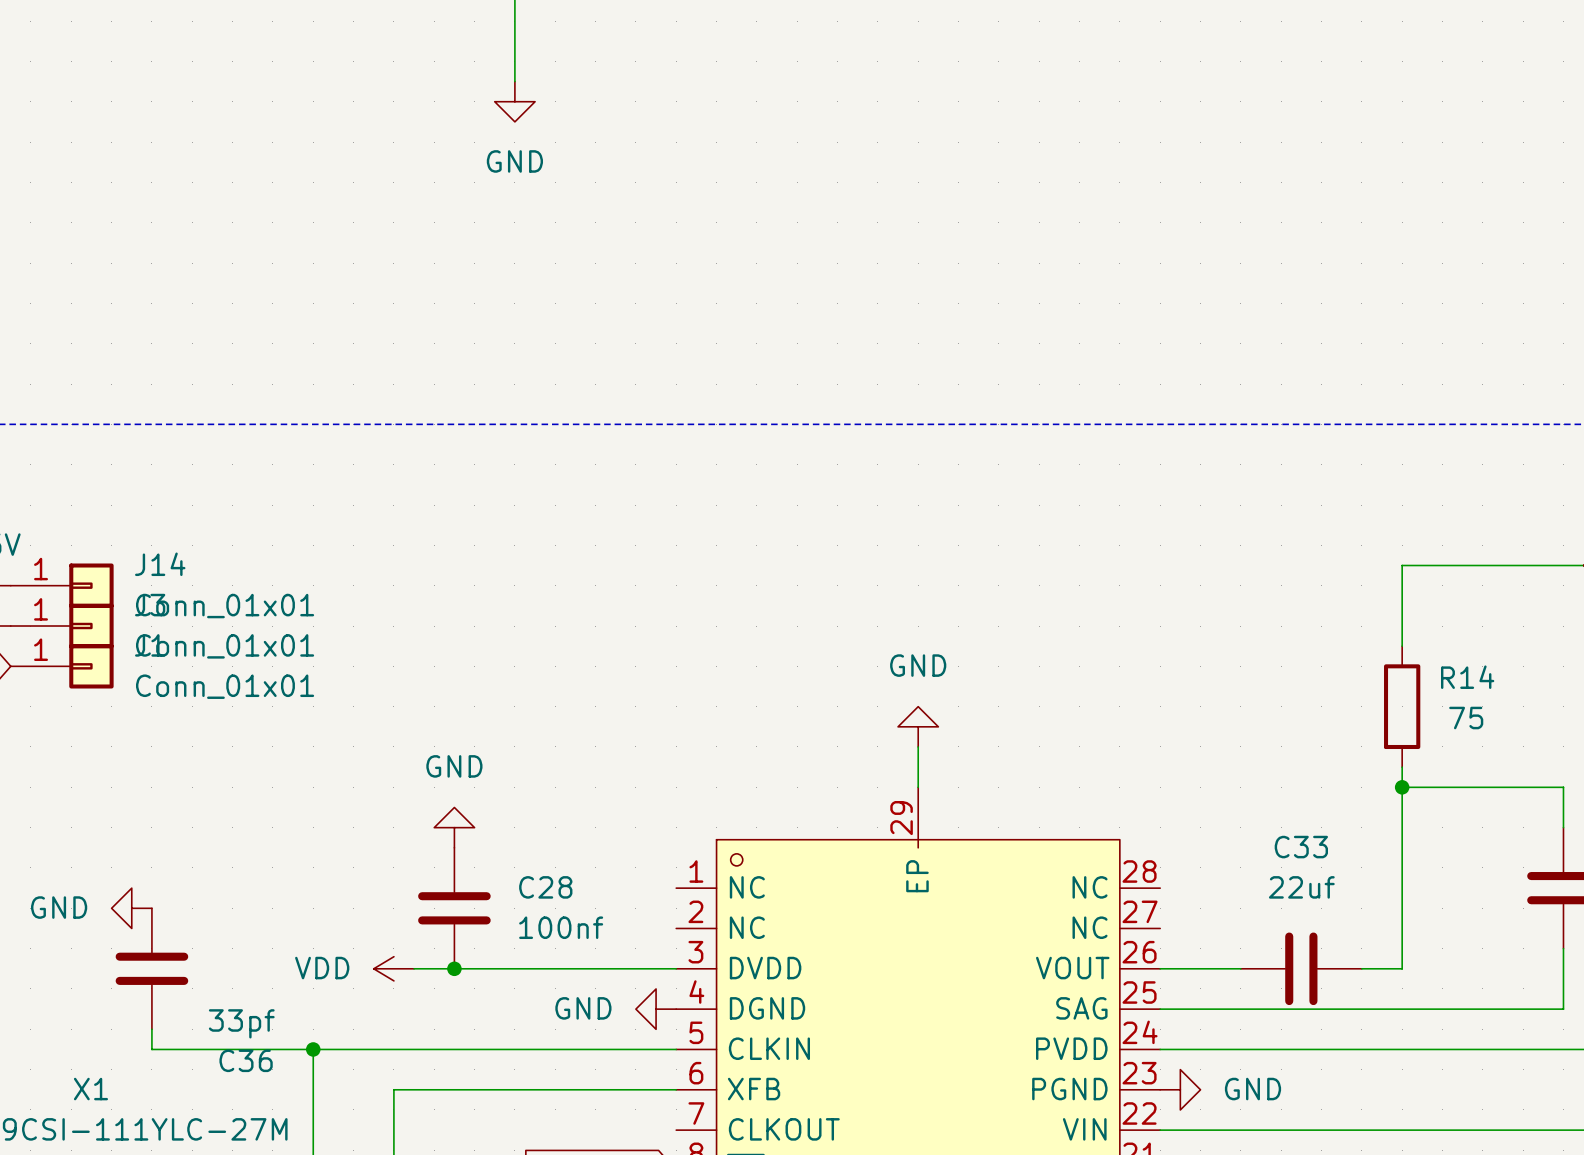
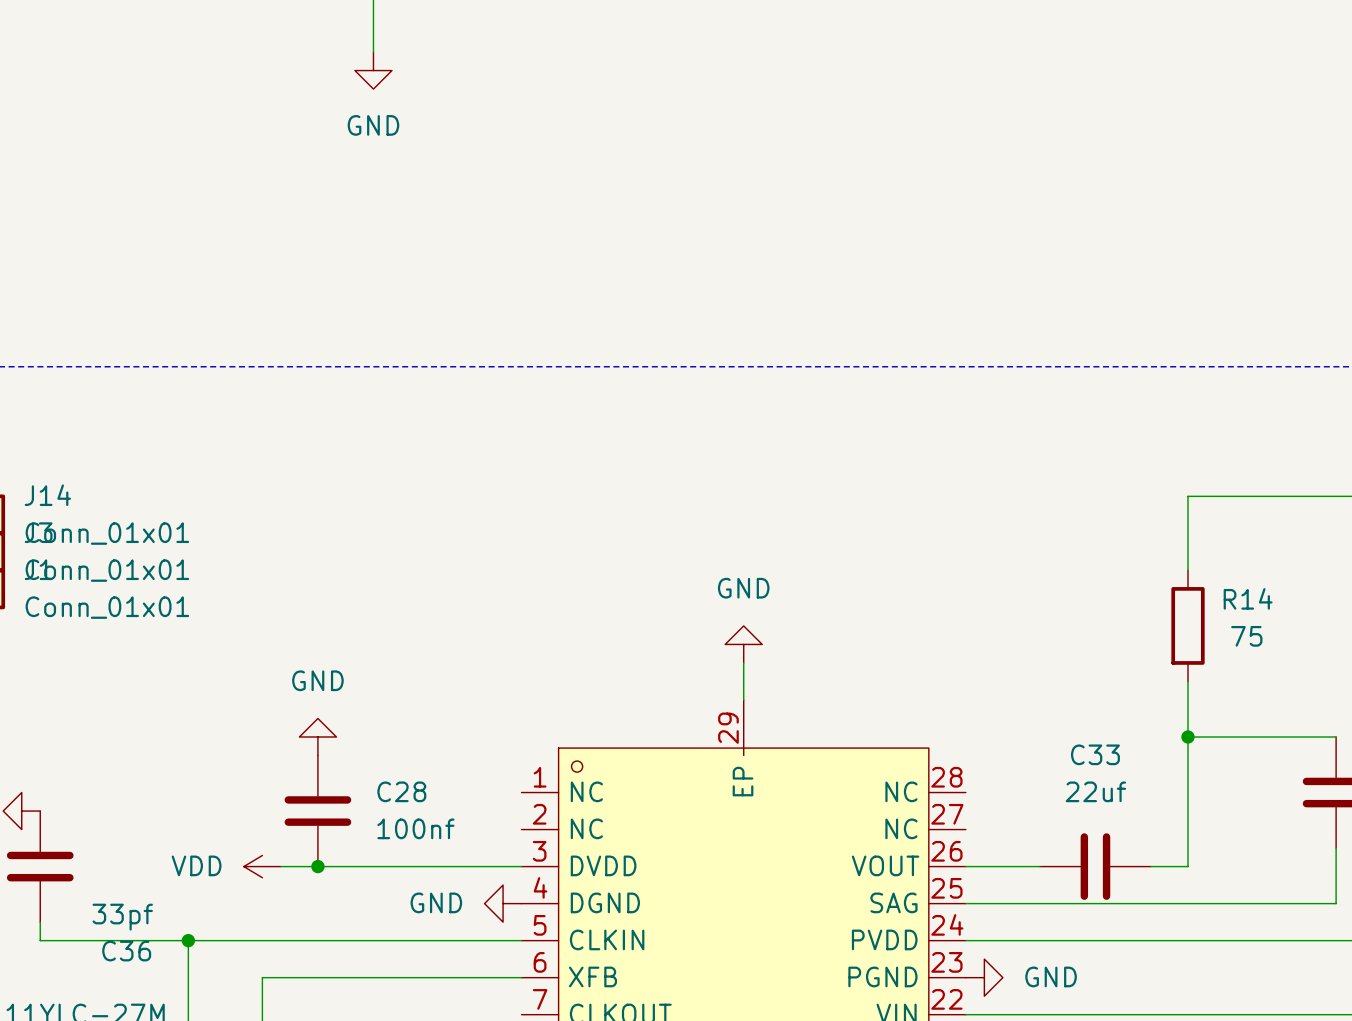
wire: (1402, 787) (1563, 787) (1563, 827) -> (1188, 737) (1336, 737)
junction position: (1402, 787) -> (1188, 737)

